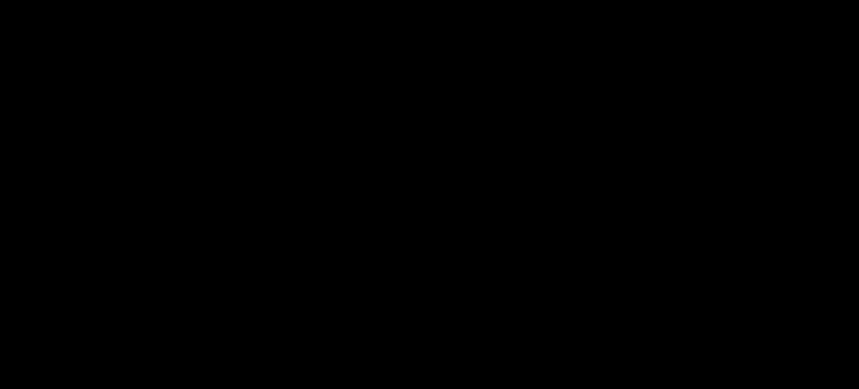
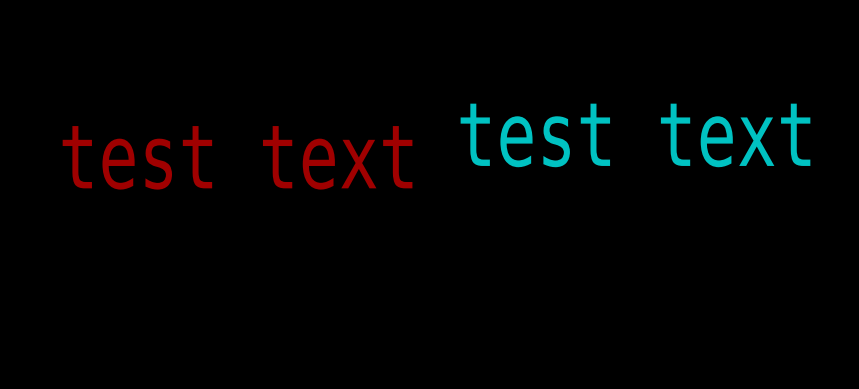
text: none -> test text (635, 135)
text: none -> test text (237, 157)

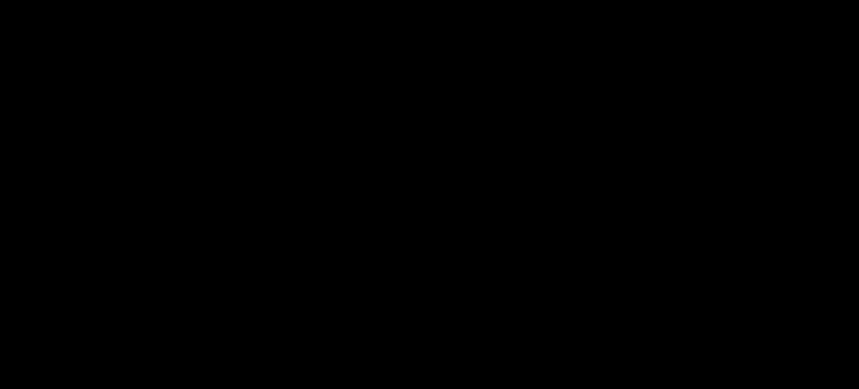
text: test text (635, 135) -> none
text: test text (237, 157) -> none

